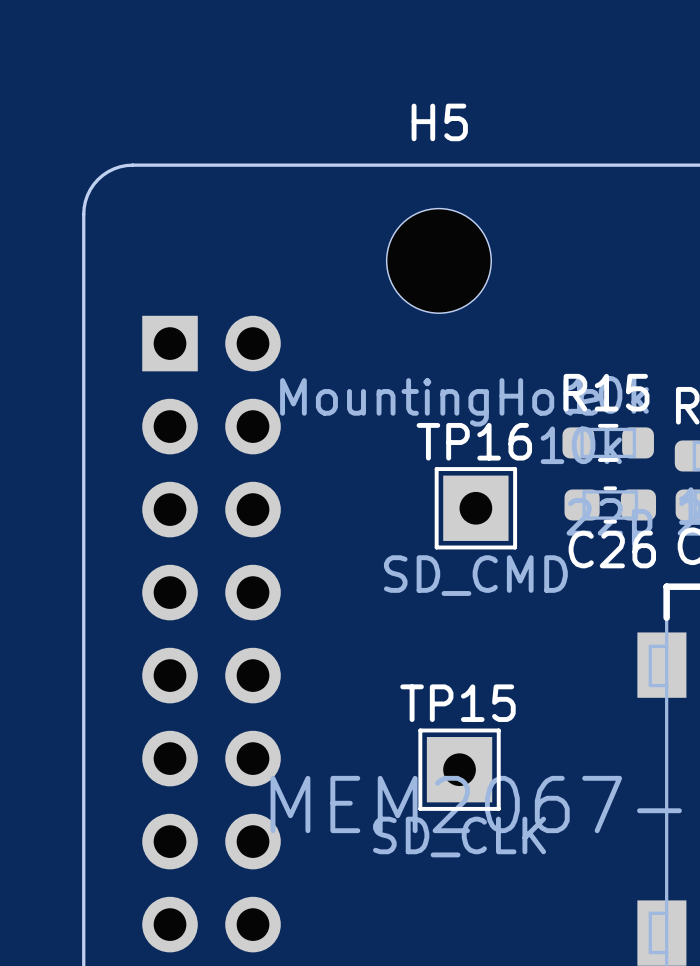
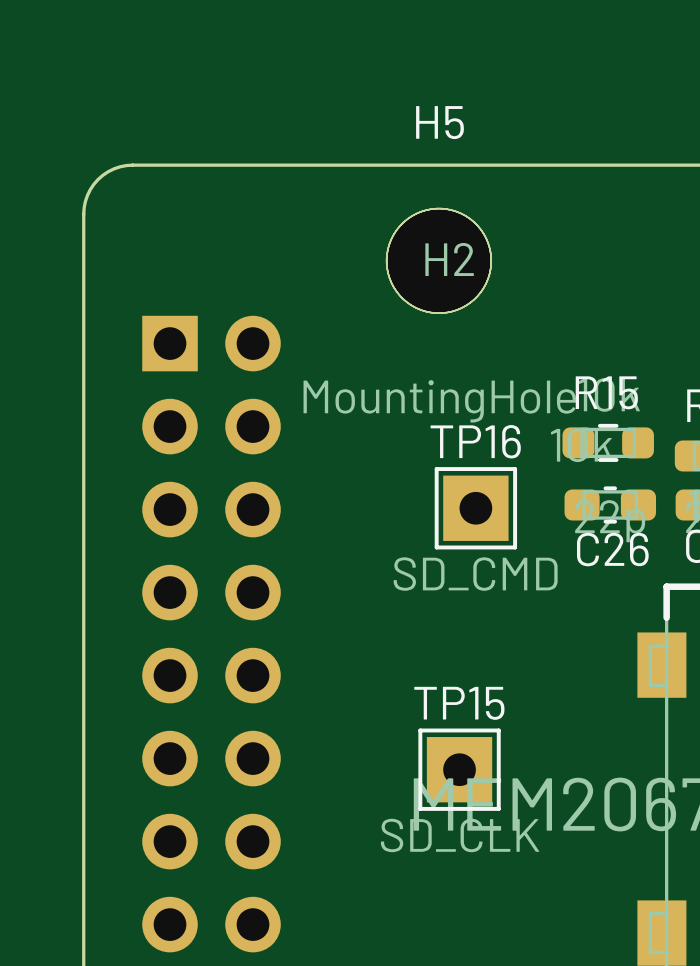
H2: none -> (438, 260)

